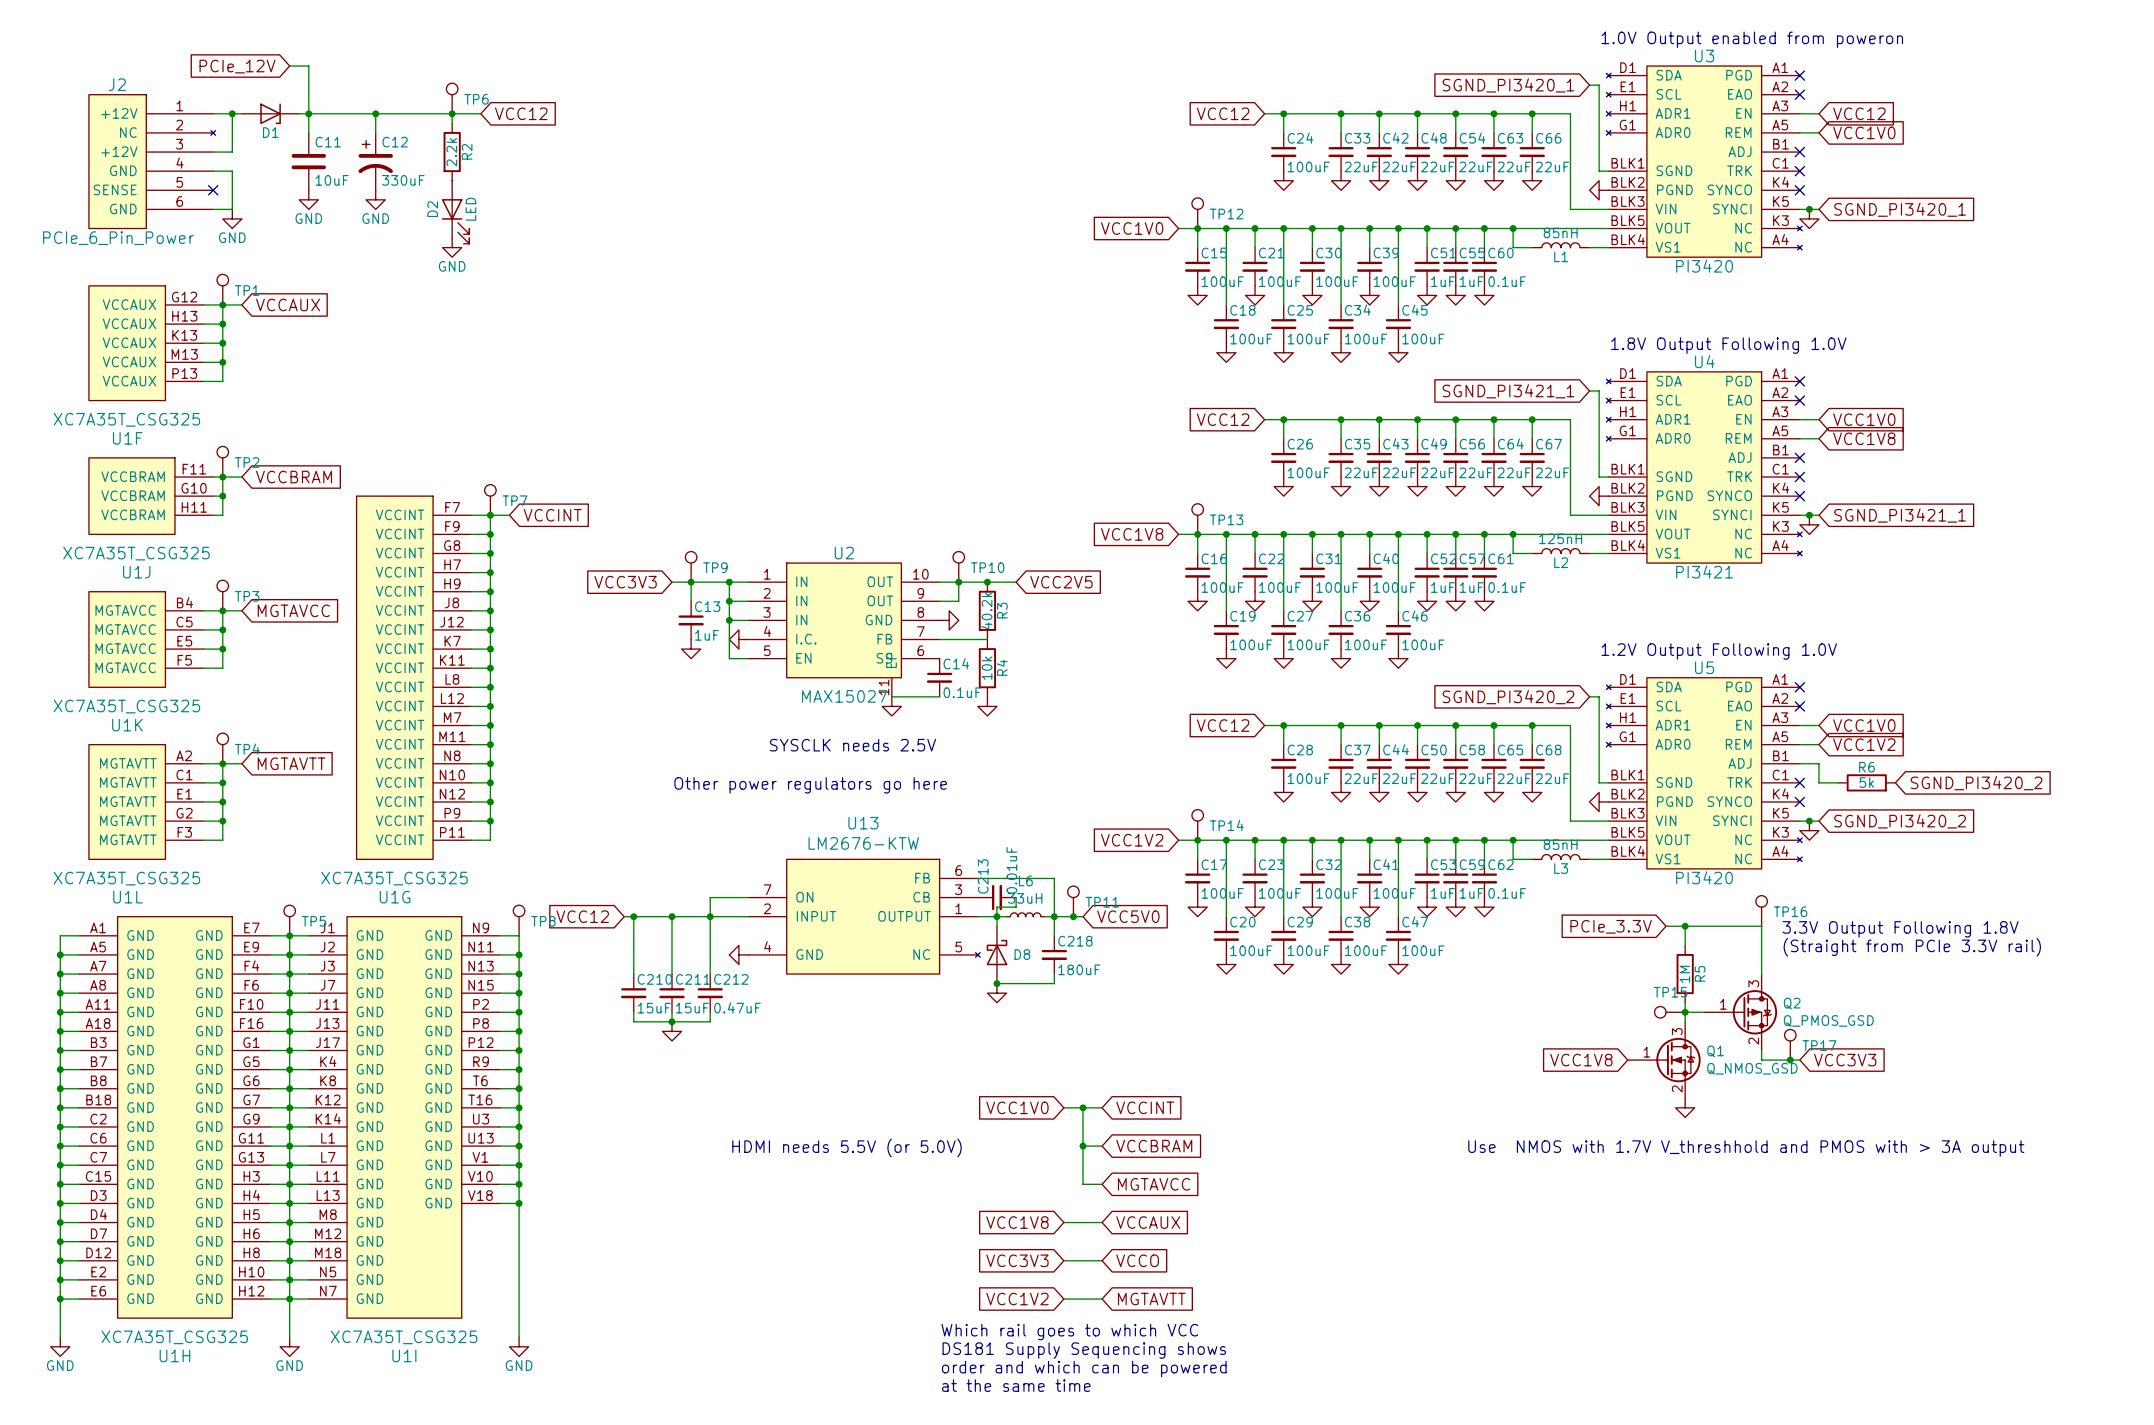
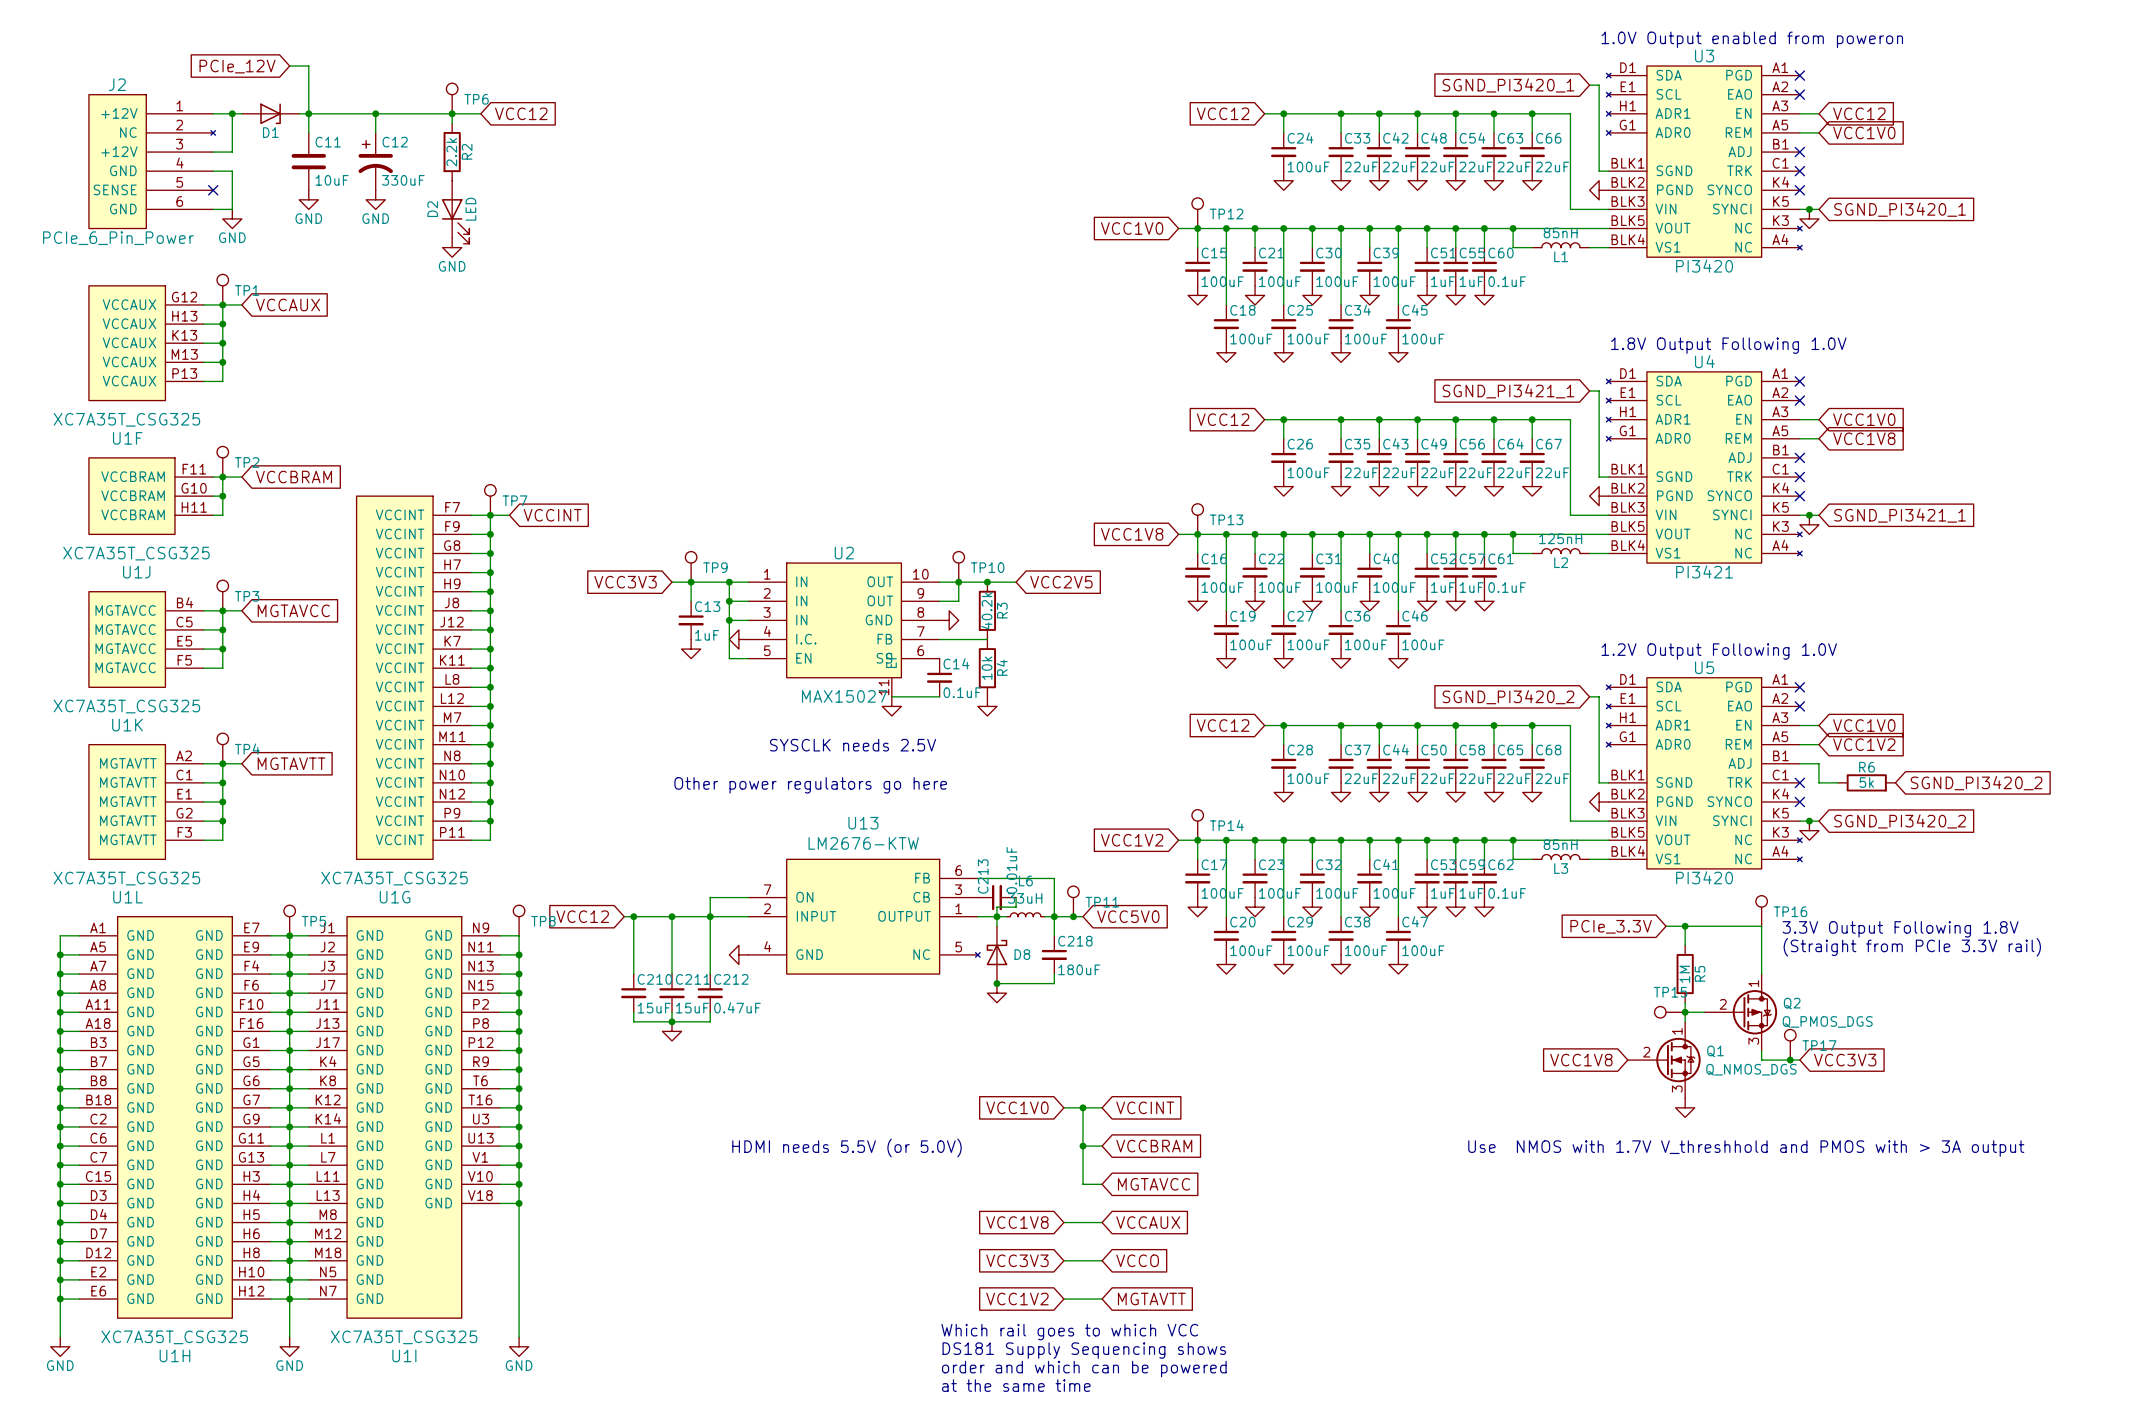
Q2 pin number: 3 (1753, 983) -> 1 (1753, 983)
Q2 pin number: 1 (1723, 1004) -> 2 (1723, 1004)
Q2 value: Q_PMOS_GSD (1828, 1020) -> Q_PMOS_DGS (1827, 1021)
Q1 pin number: 3 (1677, 1031) -> 1 (1677, 1031)
Q2 pin number: 2 (1753, 1041) -> 3 (1753, 1041)
Q1 pin number: 1 (1646, 1052) -> 2 (1646, 1052)
Q1 value: Q_NMOS_GSD (1752, 1068) -> Q_NMOS_DGS (1751, 1069)
Q1 pin number: 2 (1677, 1088) -> 3 (1677, 1088)

